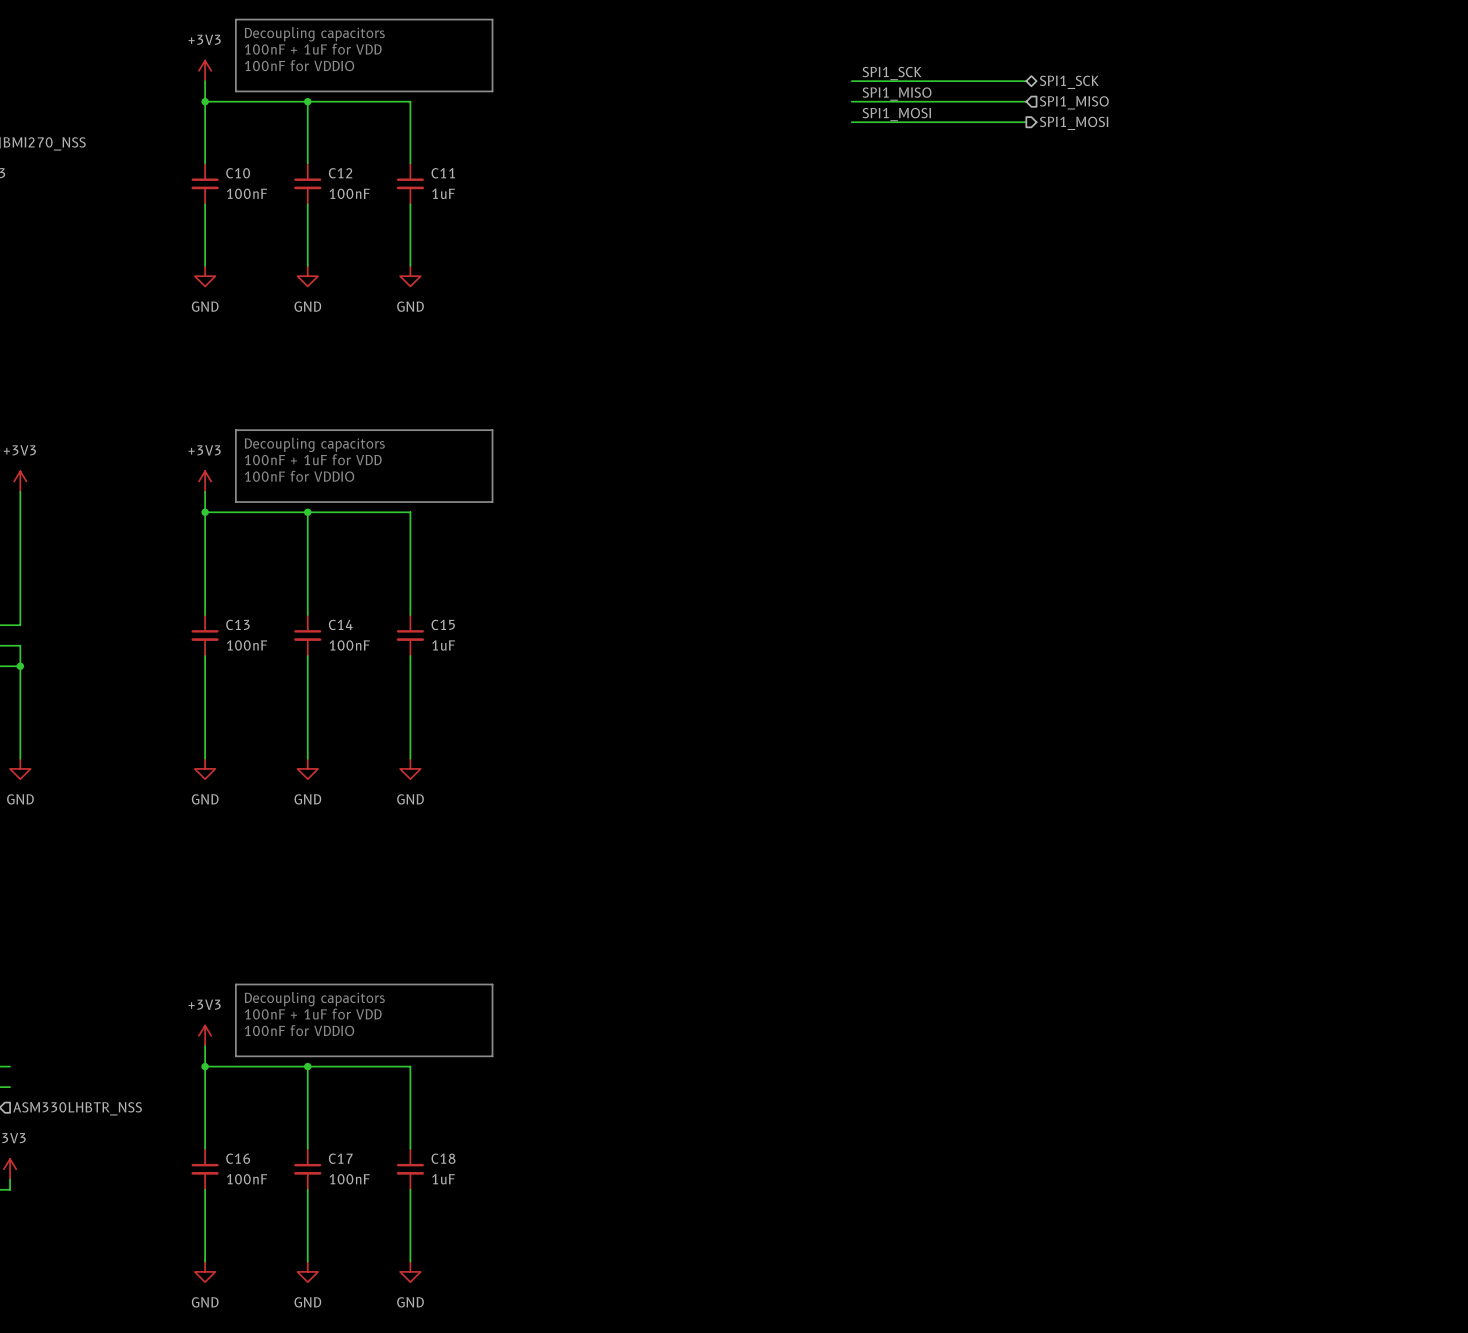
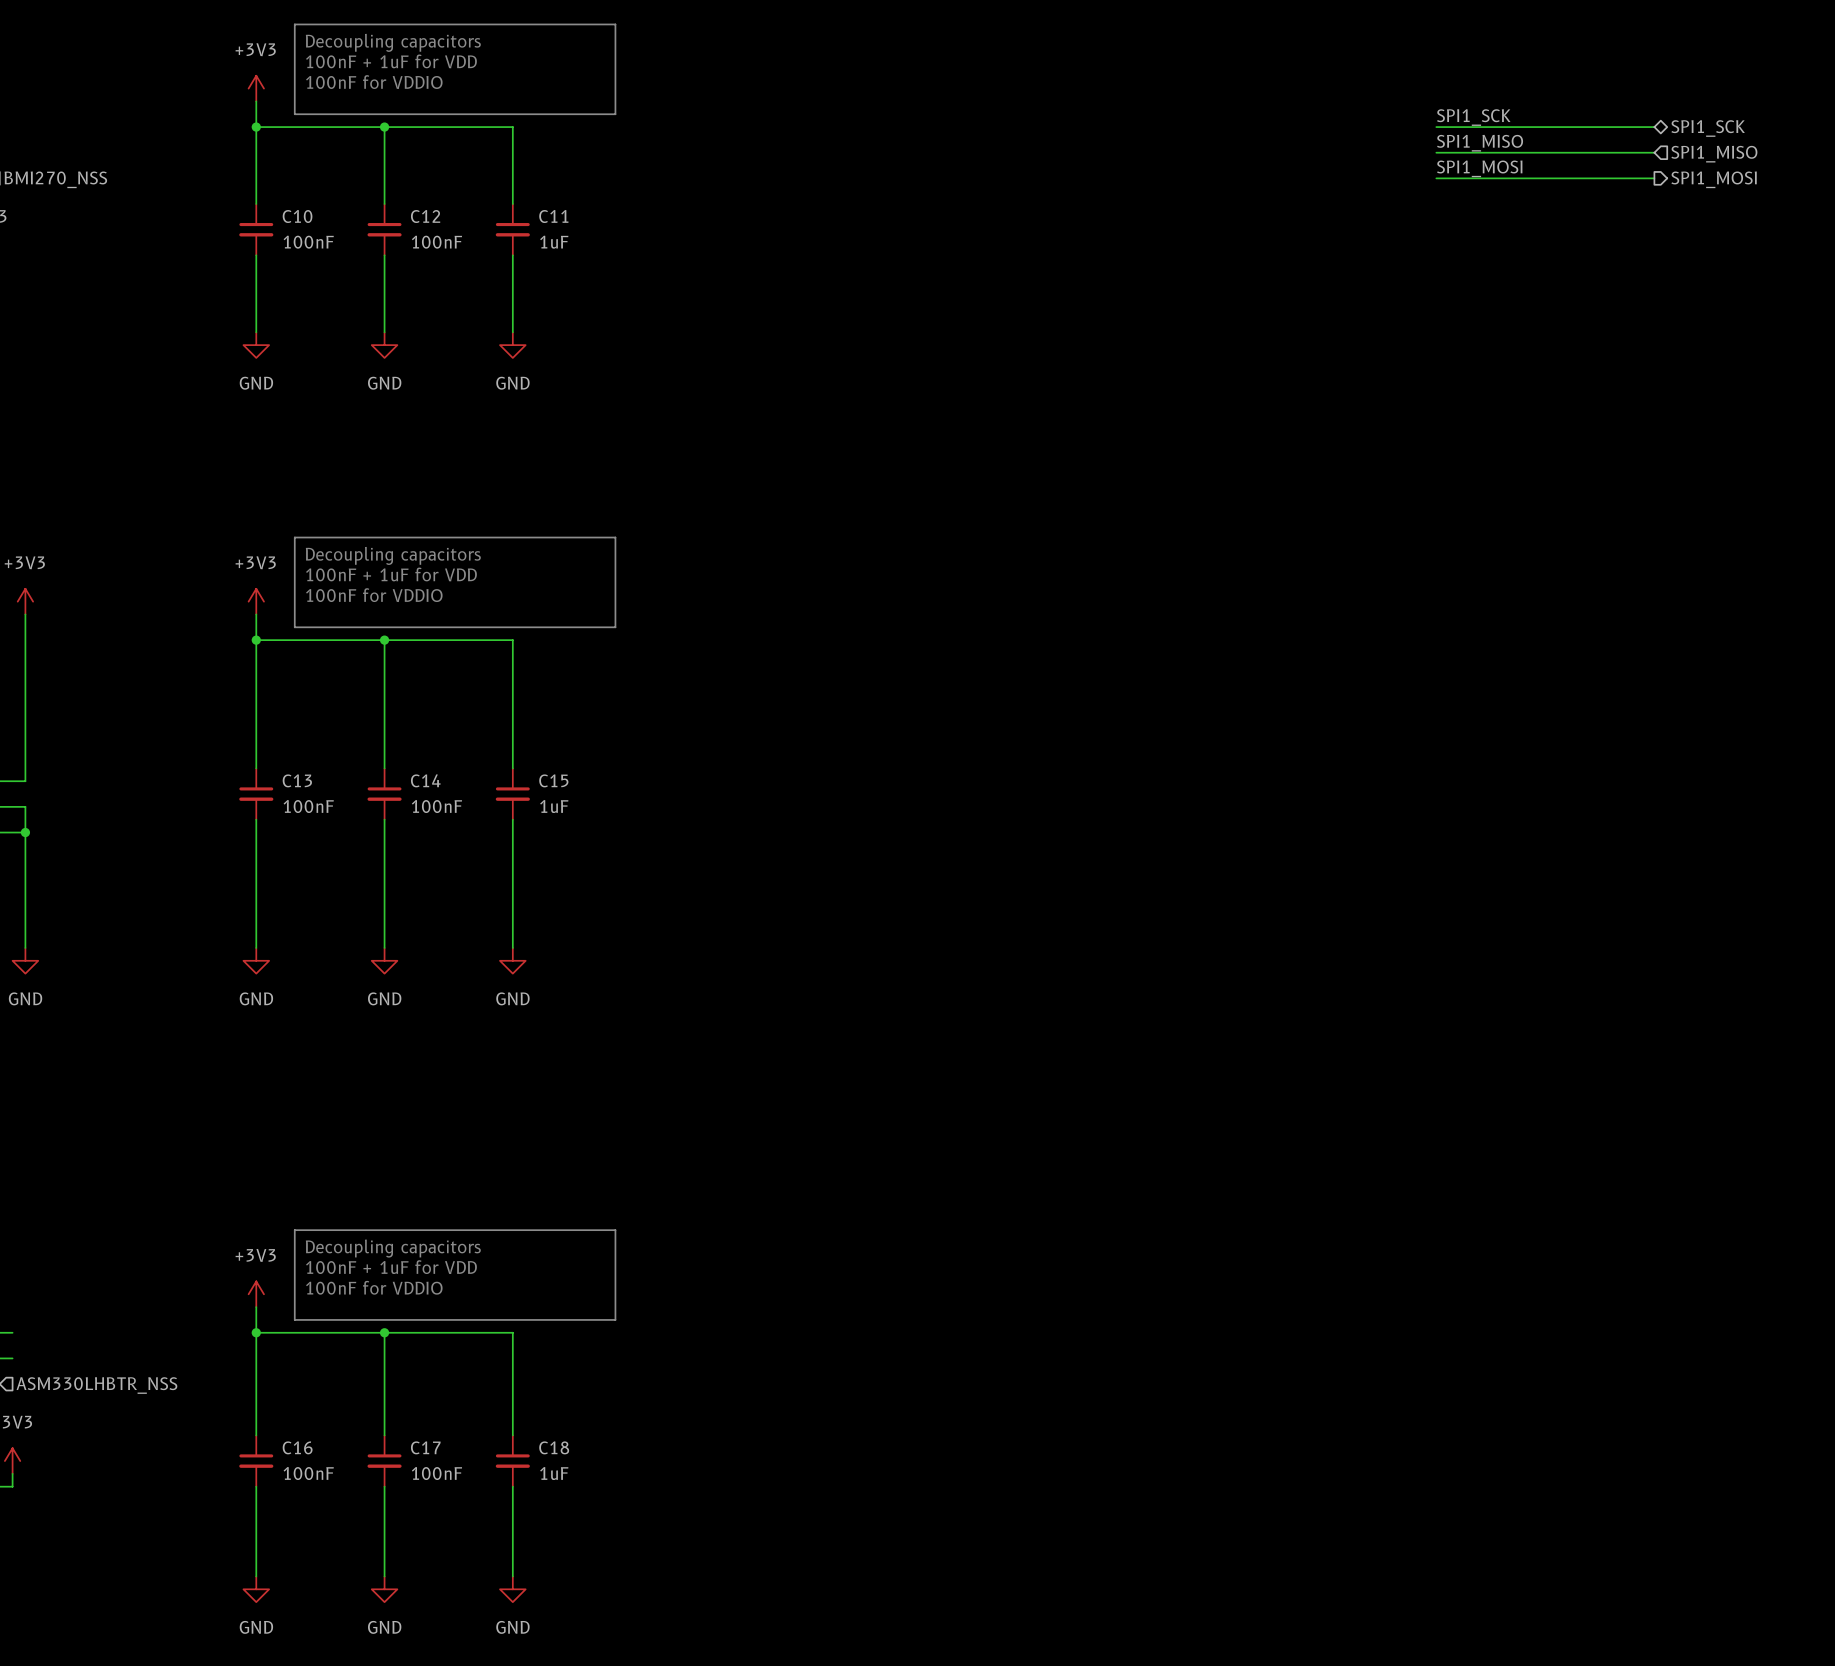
label: SPI1_SCK (892, 73) -> none
wire: (851, 81) (1026, 81) -> none
hierarchical label: SPI1_SCK (1069, 82) -> none
label: SPI1_MISO (897, 94) -> none
label: none -> SPI1_SCK (1473, 117)
wire: (851, 101) (1026, 101) -> none
wire: none -> (1436, 127) (1654, 127)
hierarchical label: SPI1_MISO (1074, 102) -> none
hierarchical label: none -> SPI1_SCK (1708, 128)
label: SPI1_MOSI (896, 114) -> none
label: none -> SPI1_MISO (1480, 143)
wire: (851, 122) (1026, 122) -> none
wire: none -> (1436, 152) (1654, 152)
hierarchical label: SPI1_MOSI (1074, 123) -> none
hierarchical label: none -> SPI1_MISO (1714, 154)
label: none -> SPI1_MOSI (1479, 168)
wire: none -> (1436, 178) (1654, 178)
hierarchical label: none -> SPI1_MOSI (1714, 179)

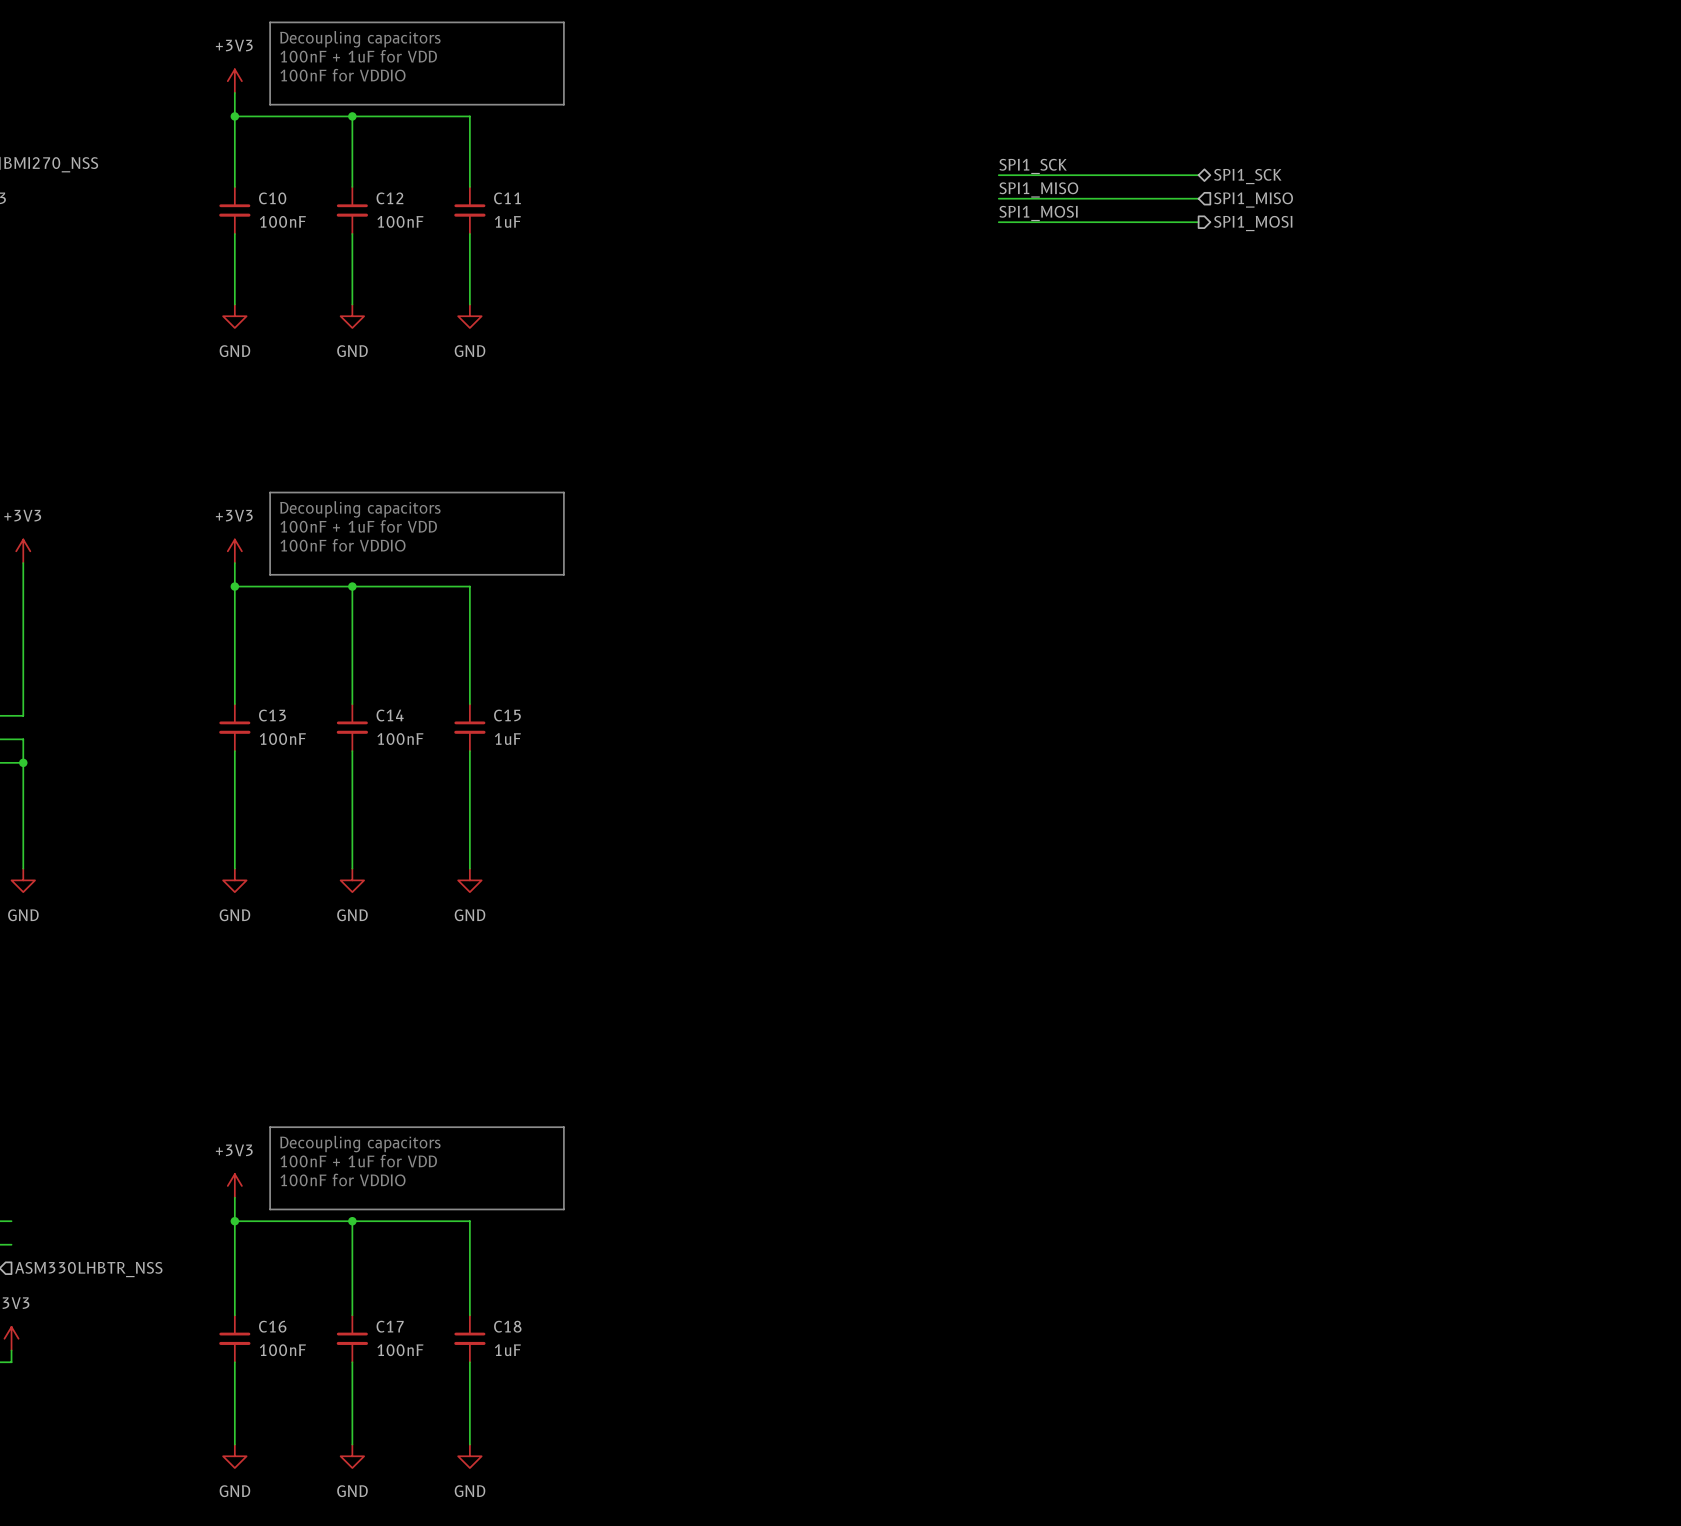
label: SPI1_SCK (1473, 117) -> none
wire: (1436, 127) (1654, 127) -> none
hierarchical label: SPI1_SCK (1708, 128) -> none
label: SPI1_MISO (1480, 143) -> none
wire: (1436, 152) (1654, 152) -> none
hierarchical label: SPI1_MISO (1714, 154) -> none
label: SPI1_MOSI (1479, 168) -> none
wire: (1436, 178) (1654, 178) -> none
hierarchical label: SPI1_MOSI (1714, 179) -> none
label: none -> SPI1_SCK (1033, 166)
wire: none -> (998, 175) (1198, 175)
hierarchical label: none -> SPI1_SCK (1247, 176)
label: none -> SPI1_MISO (1038, 189)
wire: none -> (998, 198) (1198, 198)
hierarchical label: none -> SPI1_MISO (1253, 200)
label: none -> SPI1_MOSI (1038, 213)
wire: none -> (998, 222) (1198, 222)
hierarchical label: none -> SPI1_MOSI (1253, 223)

